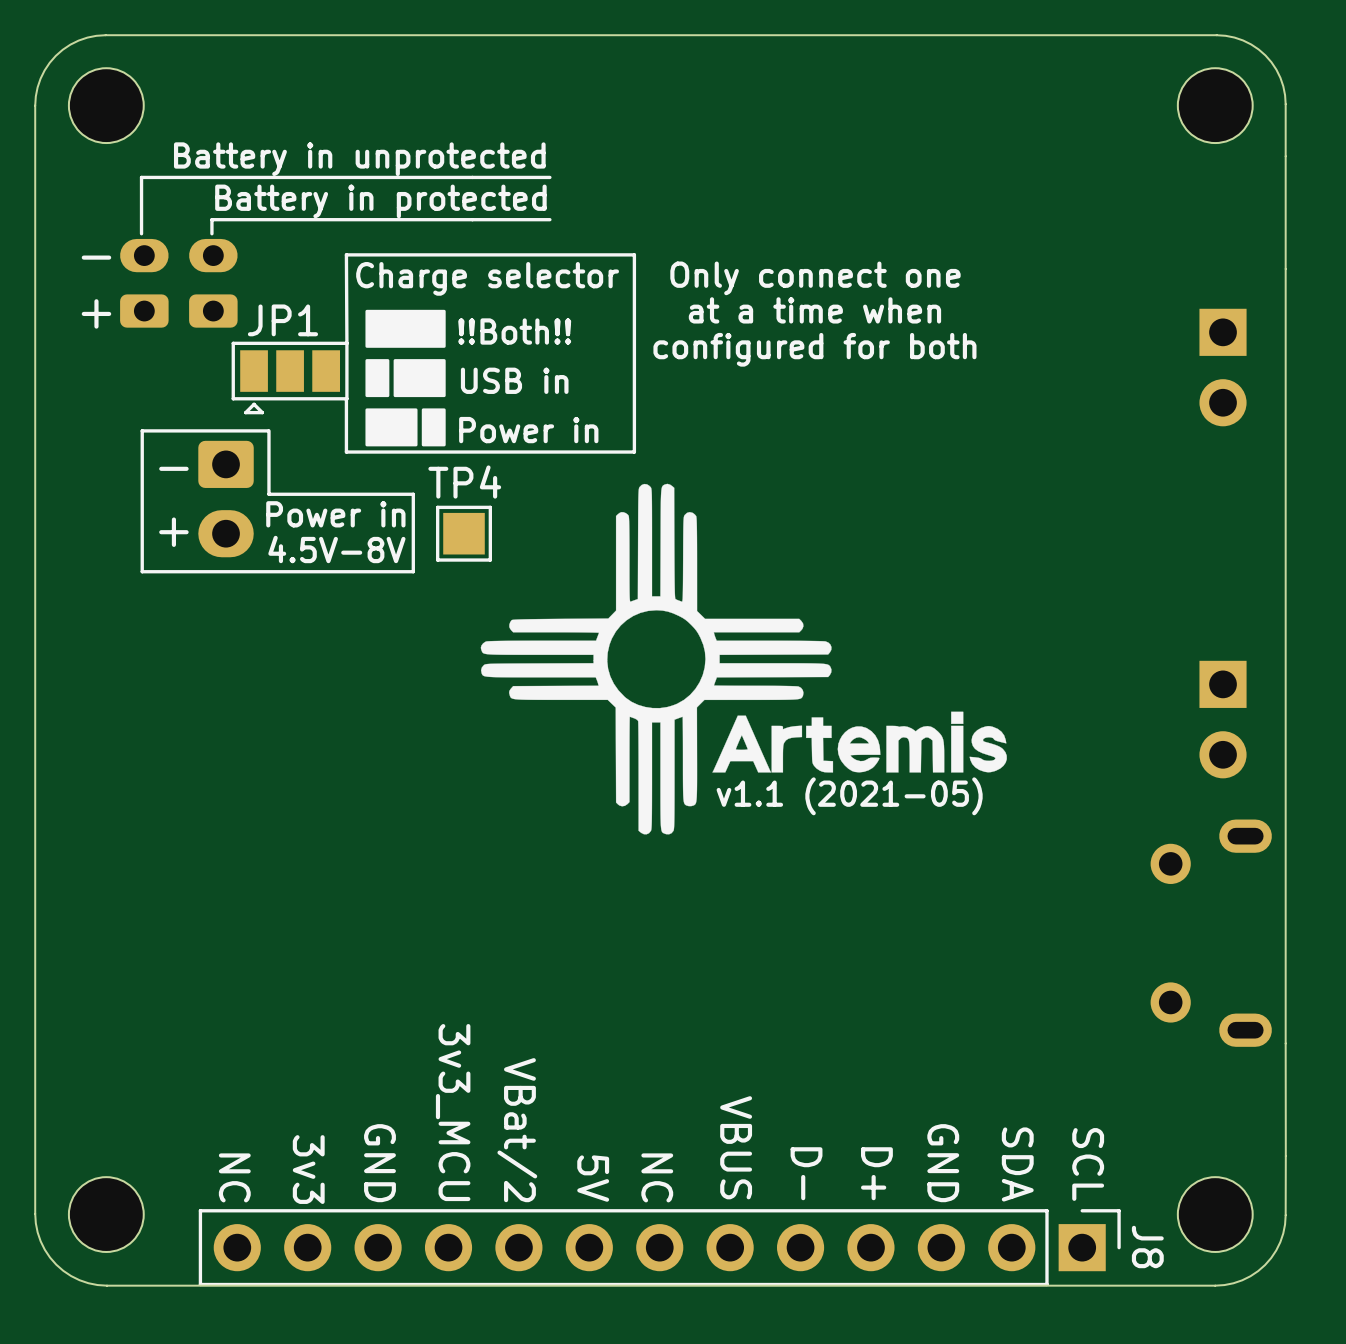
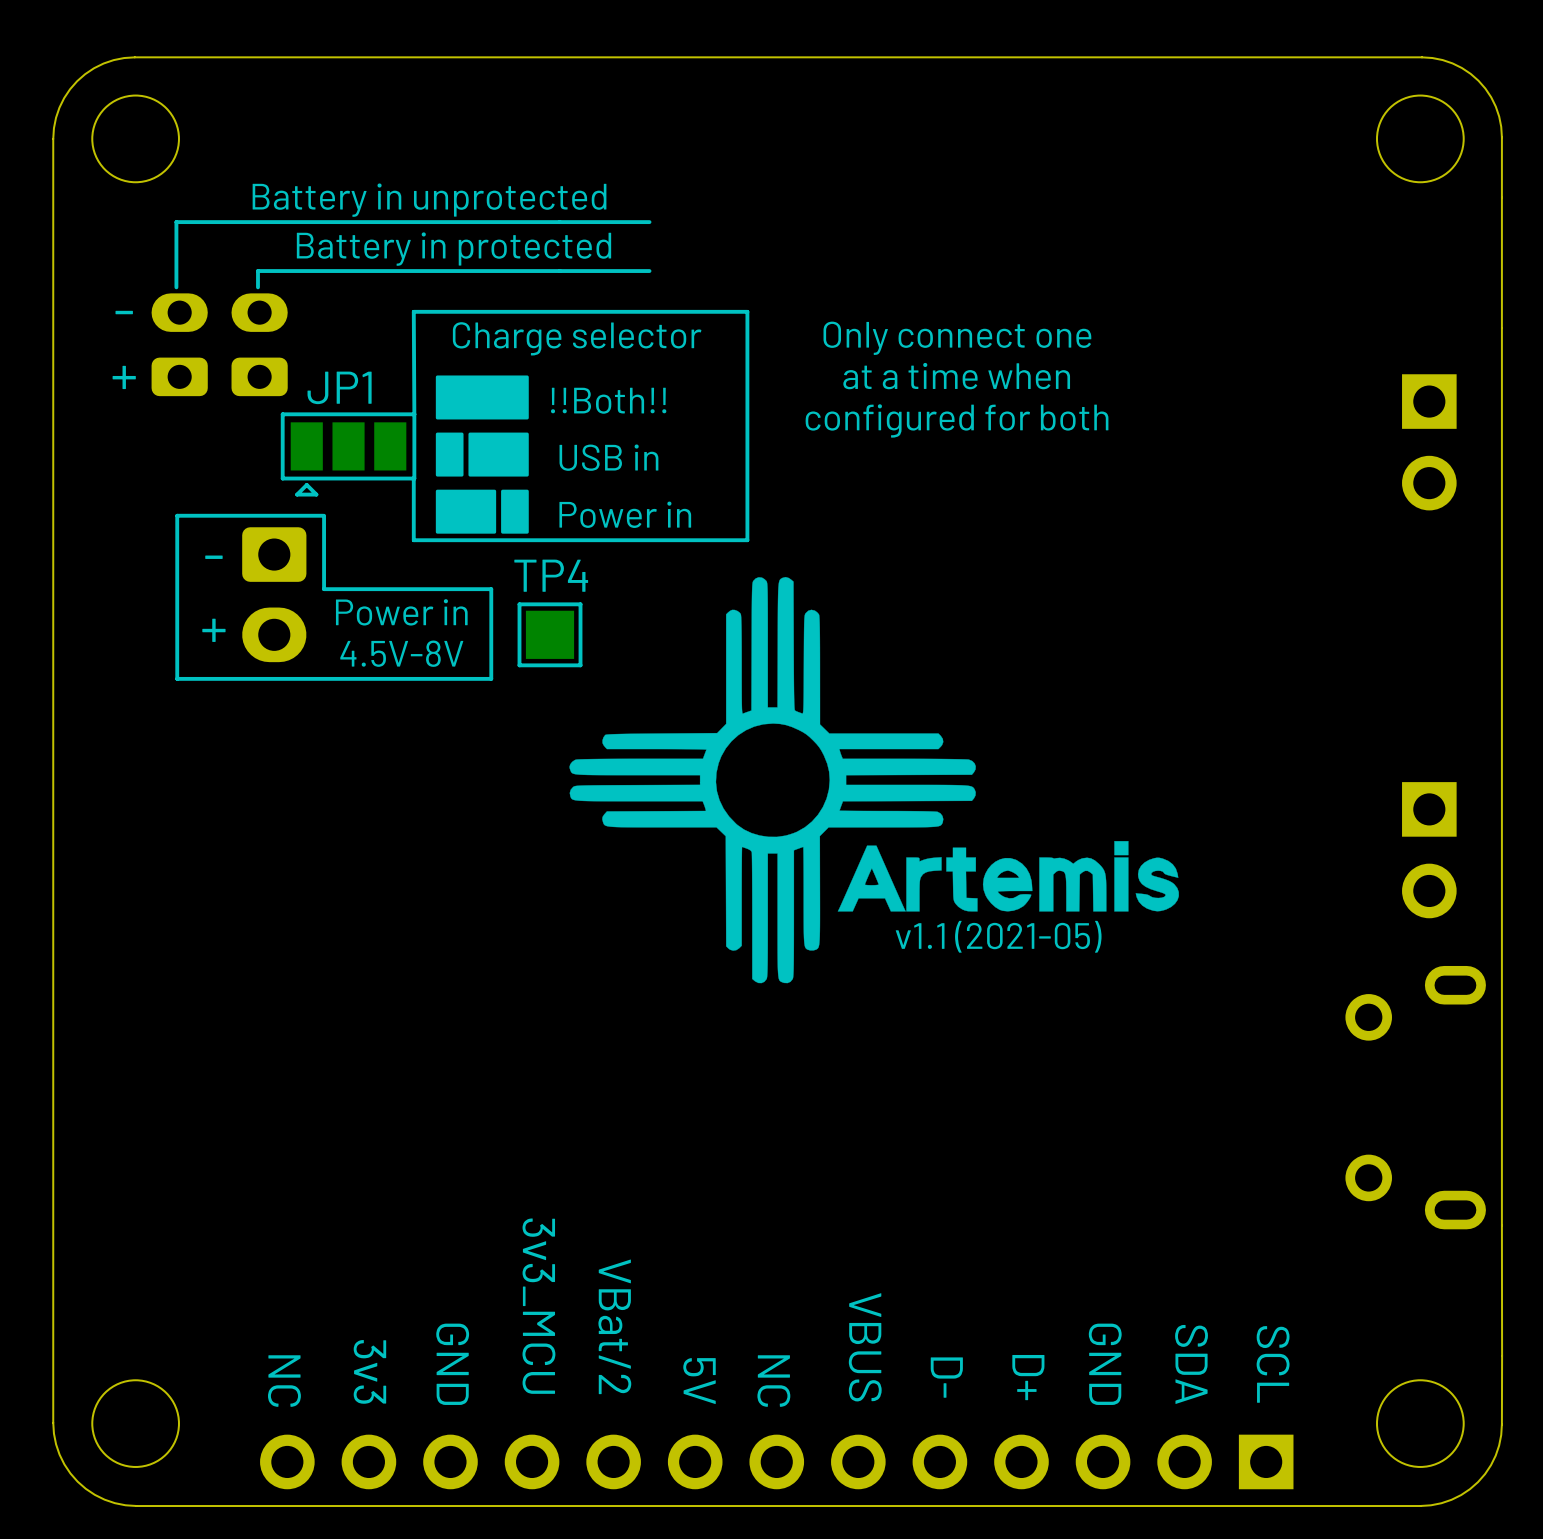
J8 side: bottom (659, 1247) -> top (776, 1461)

